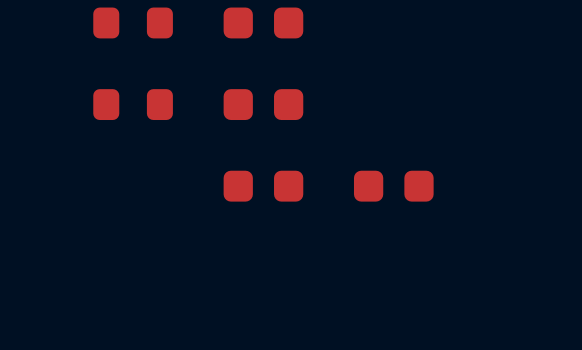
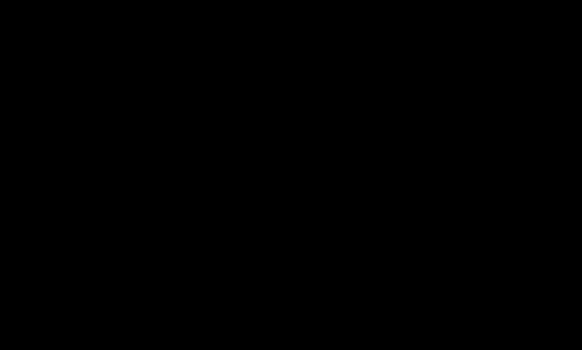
part: (133, 22) -> none
part: (263, 22) -> none
part: (133, 104) -> none
part: (263, 104) -> none
part: (263, 186) -> none
part: (393, 186) -> none

